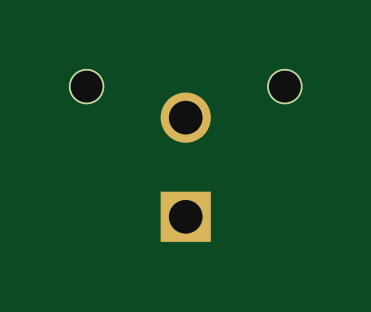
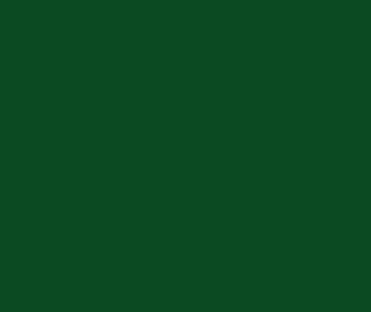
part: (185, 155) -> none

